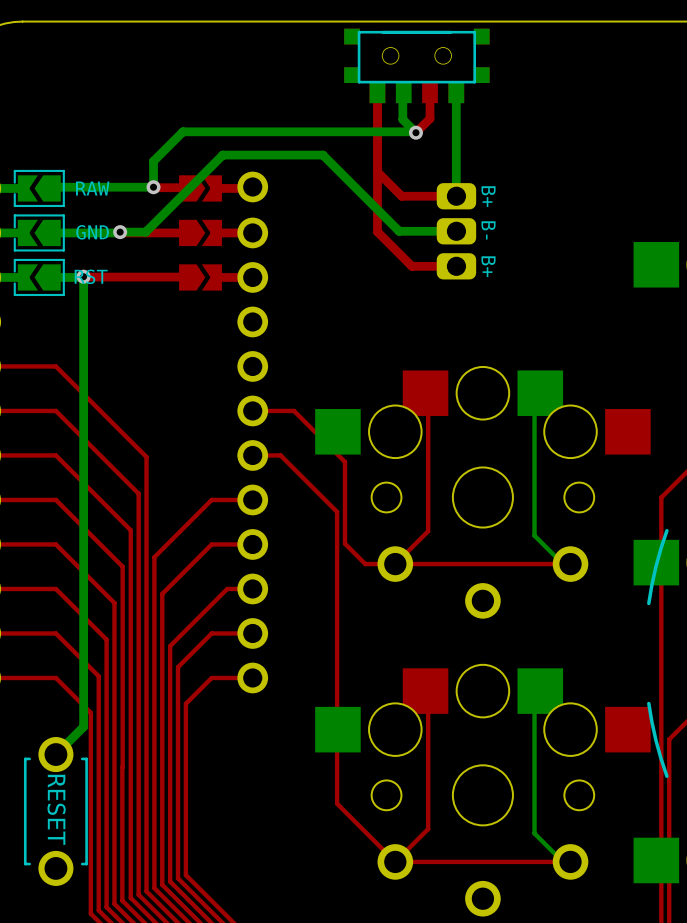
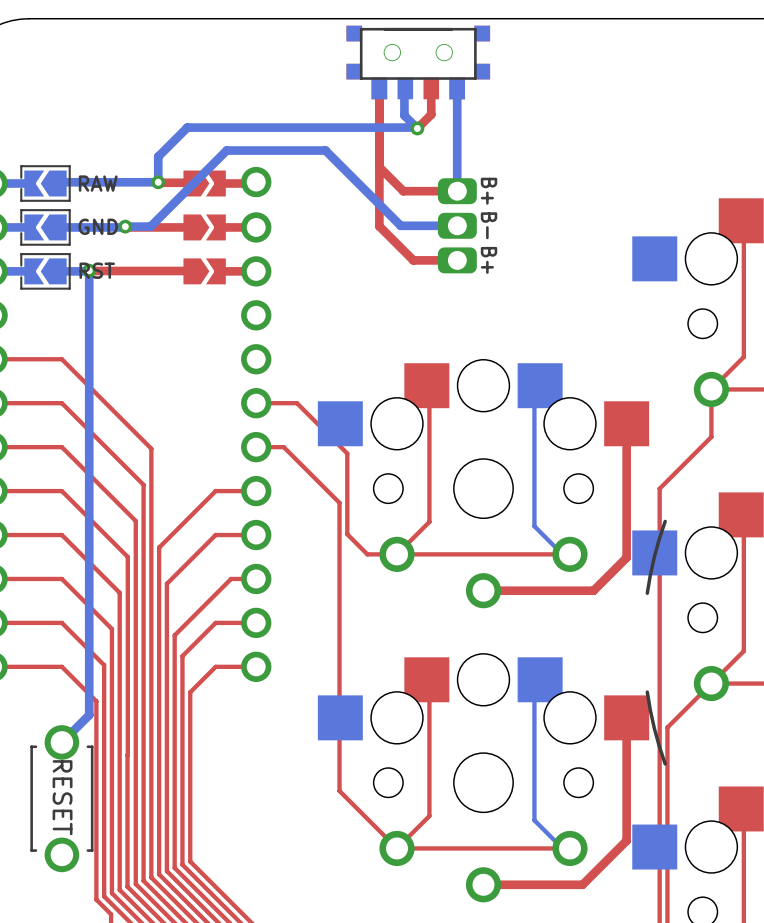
top track: none -> (626, 423) (626, 557) (593, 590) (483, 590)
top track: none -> (626, 717) (626, 840) (582, 884) (483, 884)

